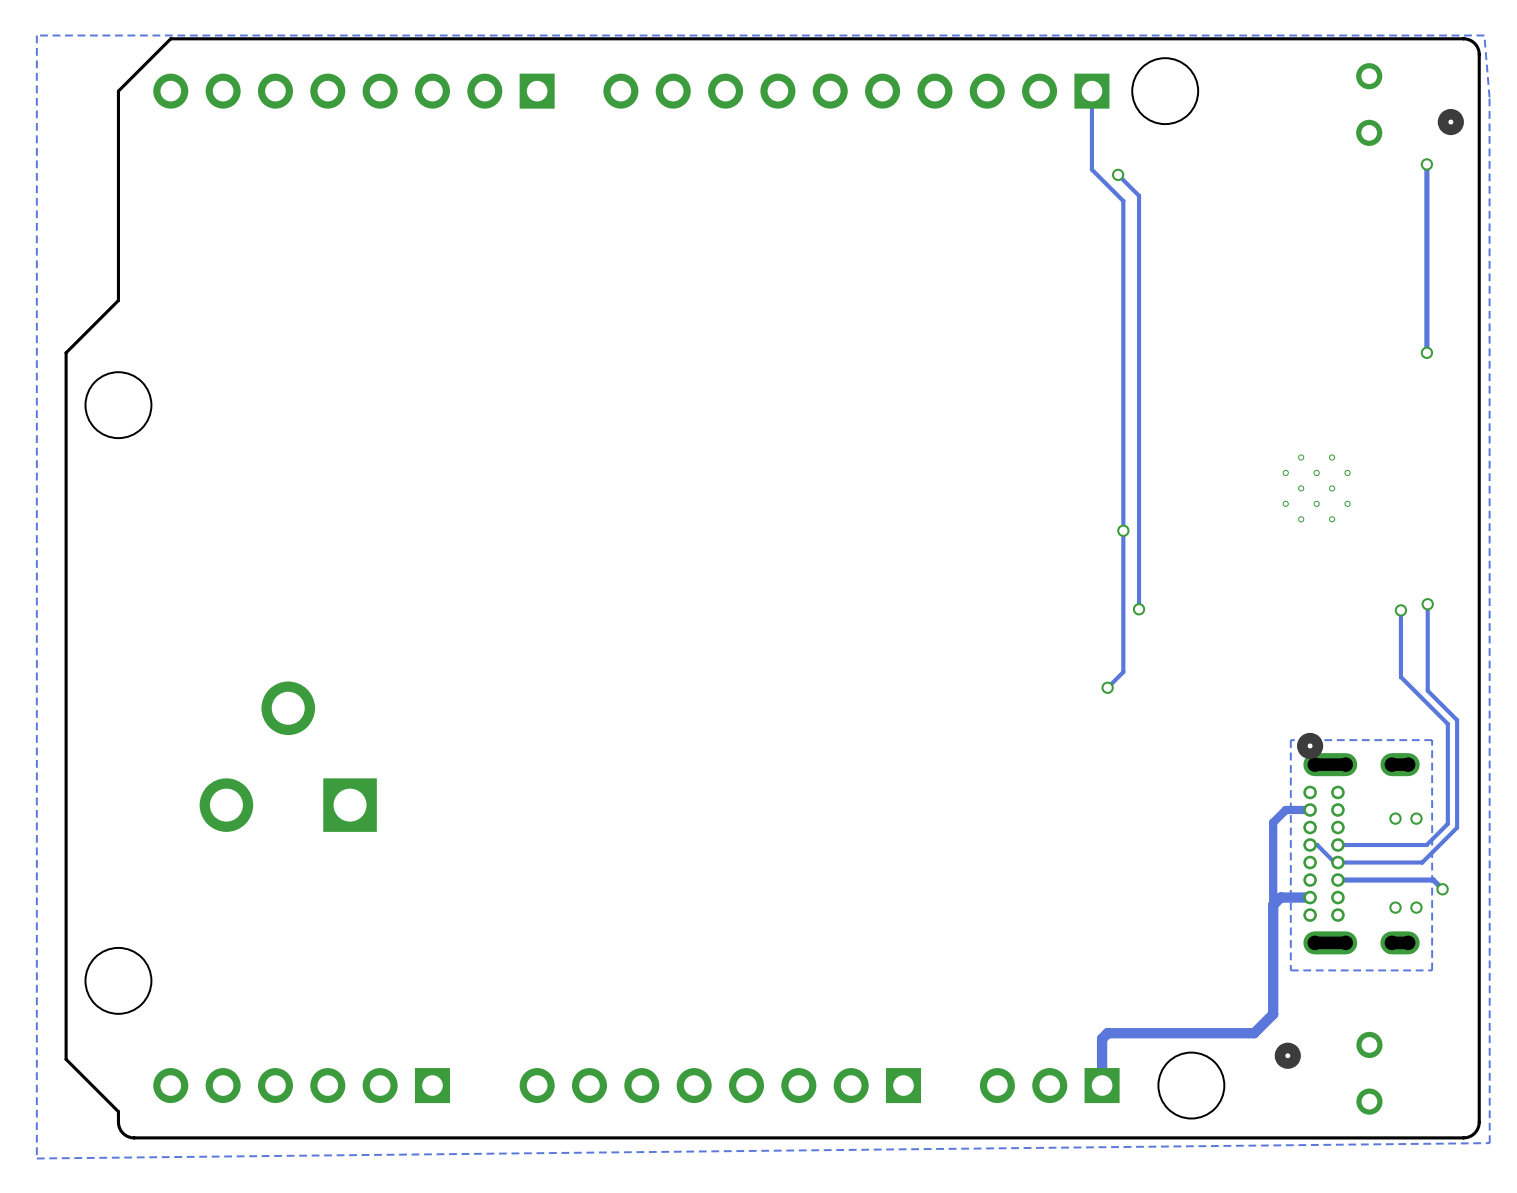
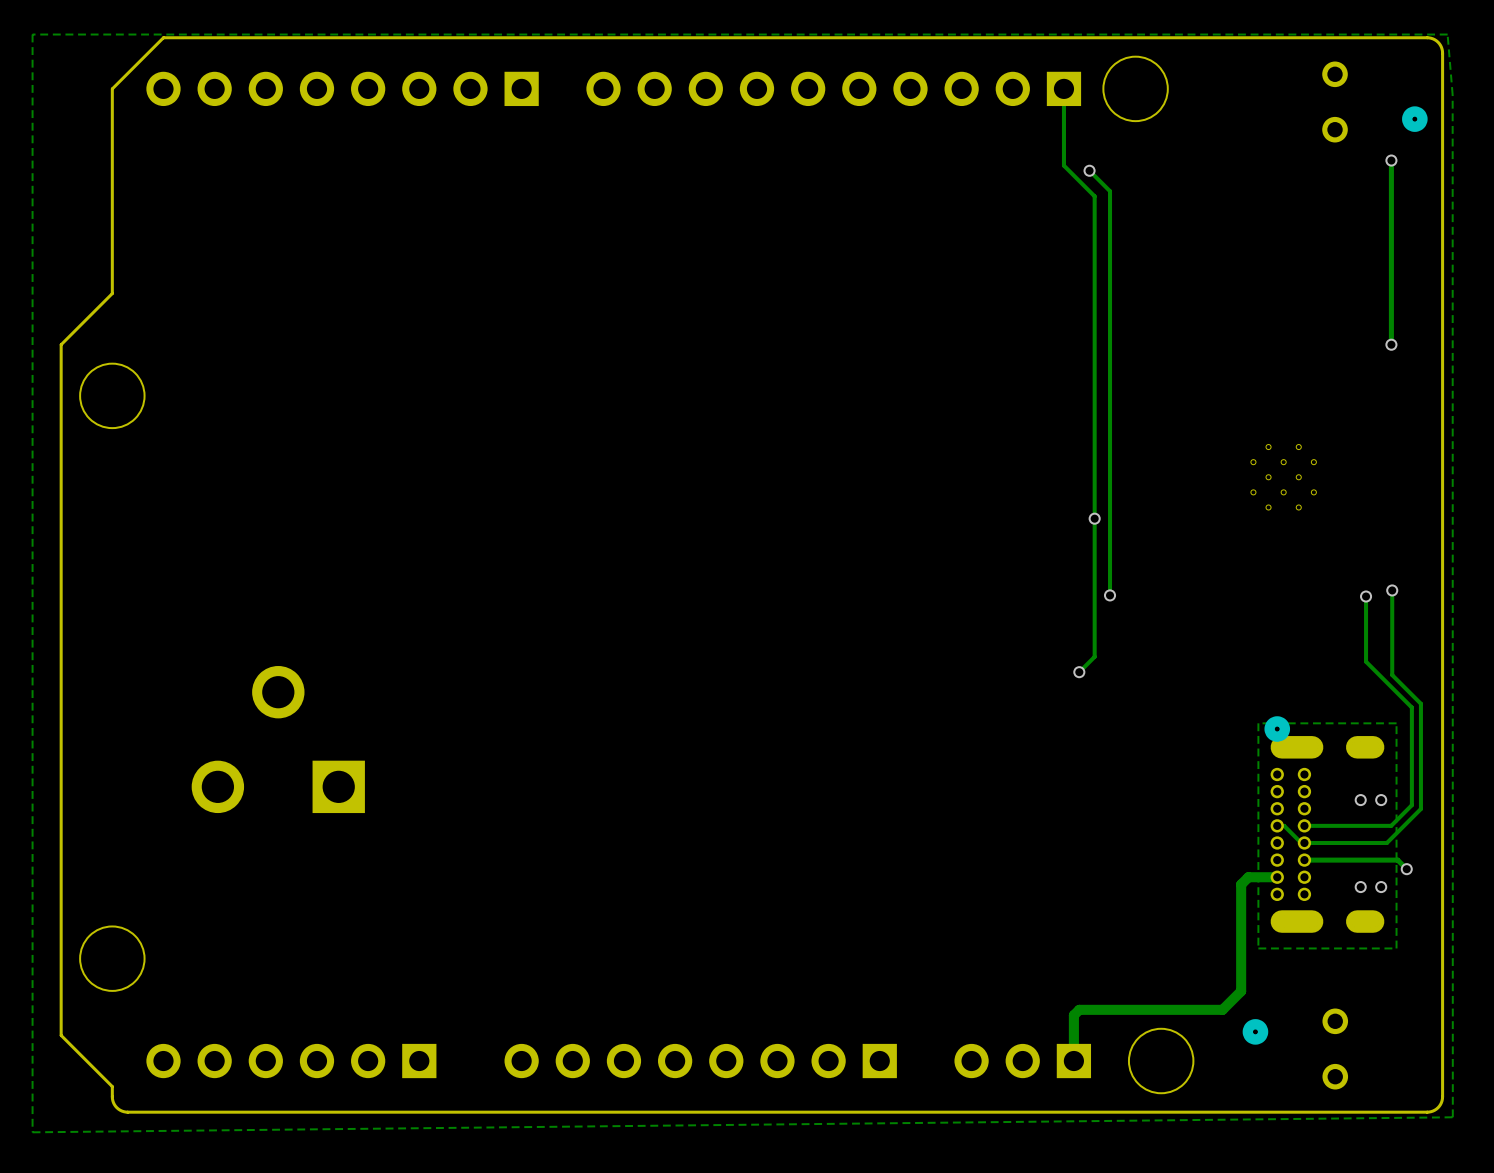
track: (1310, 809) (1285, 809) (1273, 822) (1273, 905) -> none

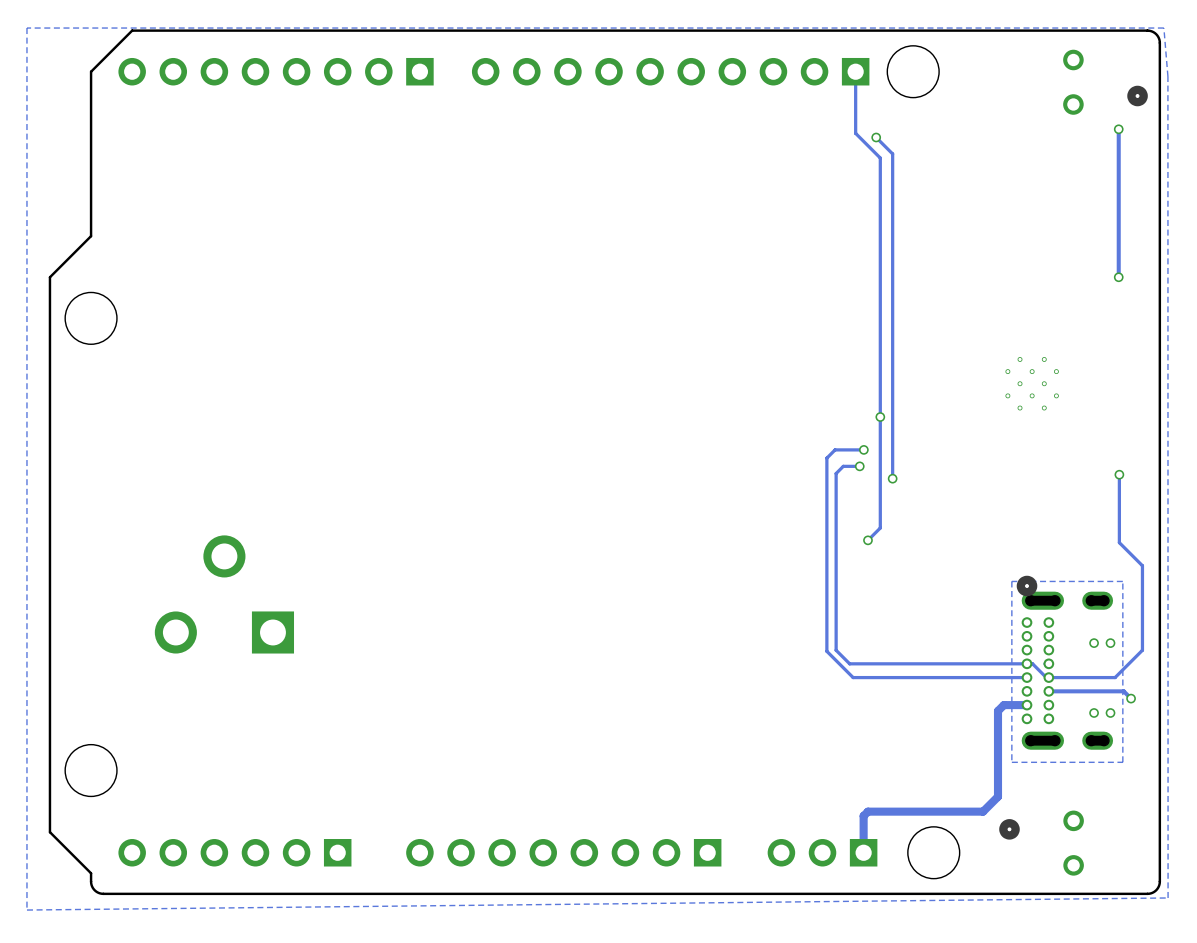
track: none -> (863, 449) (835, 449) (826, 458) (826, 651) (853, 677) (1027, 677)
via: none -> (863, 449)
track: none -> (859, 466) (843, 466) (836, 473) (836, 650) (849, 663) (1027, 663)
via: none -> (859, 466)
track: (1366, 596) (1366, 661) (1411, 707) (1411, 805) (1391, 825) (1304, 825) -> none
via: (1366, 596) -> none

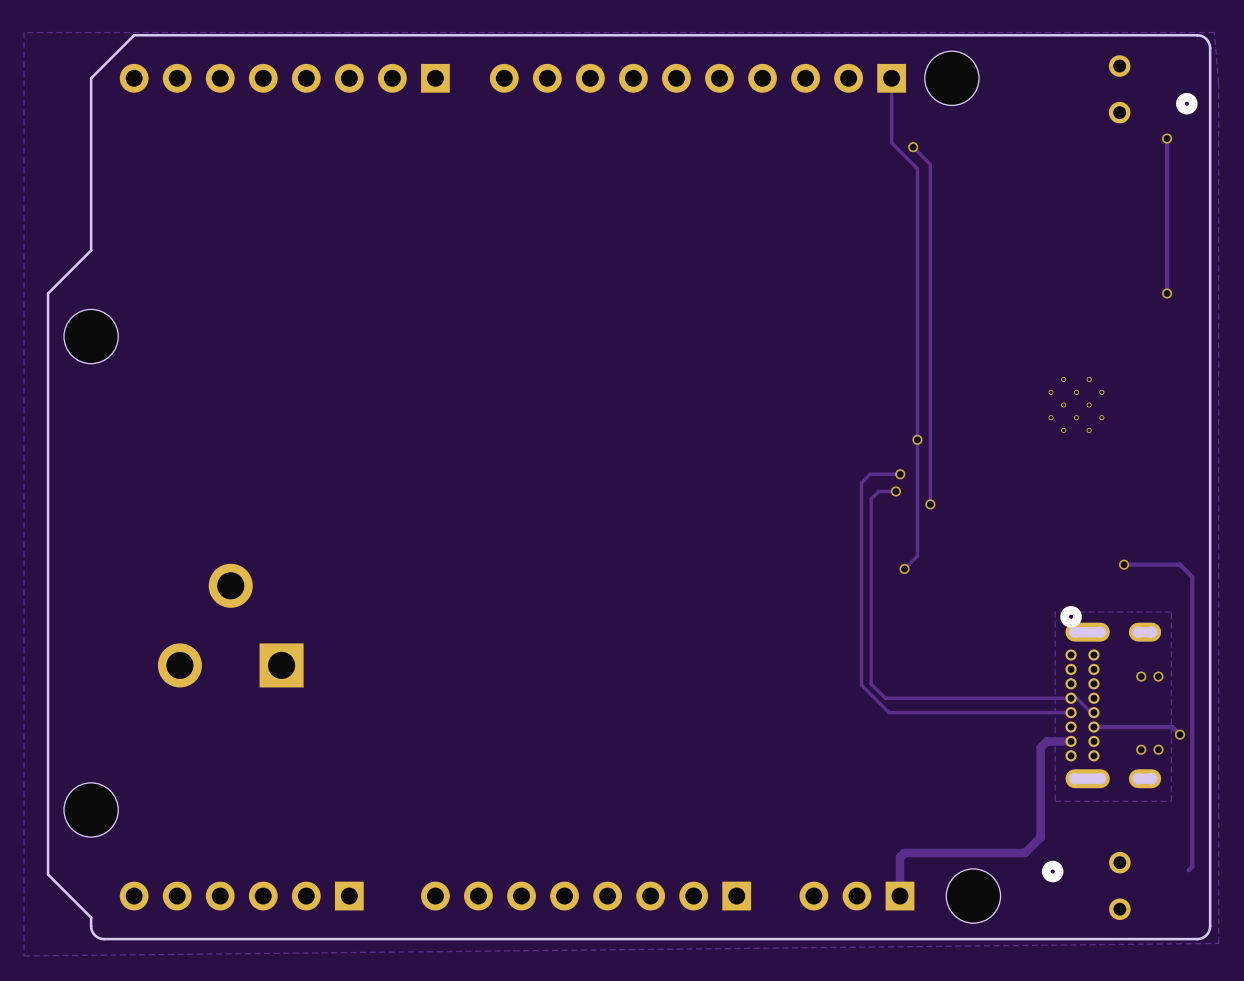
track: (1119, 474) (1119, 542) (1142, 565) (1142, 650) (1115, 677) (1048, 677) -> none
via position: (1119, 474) -> (1124, 564)
track: none -> (1124, 564) (1180, 564) (1192, 576) (1192, 866) (1188, 870)

